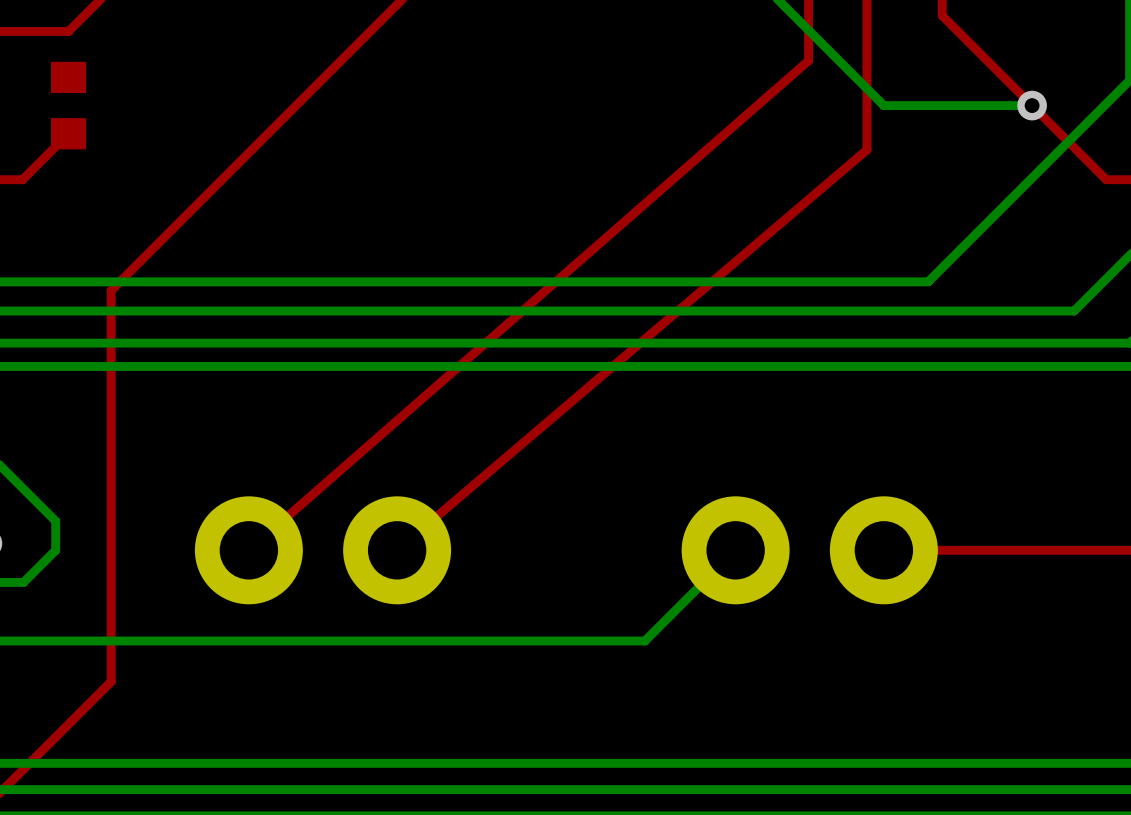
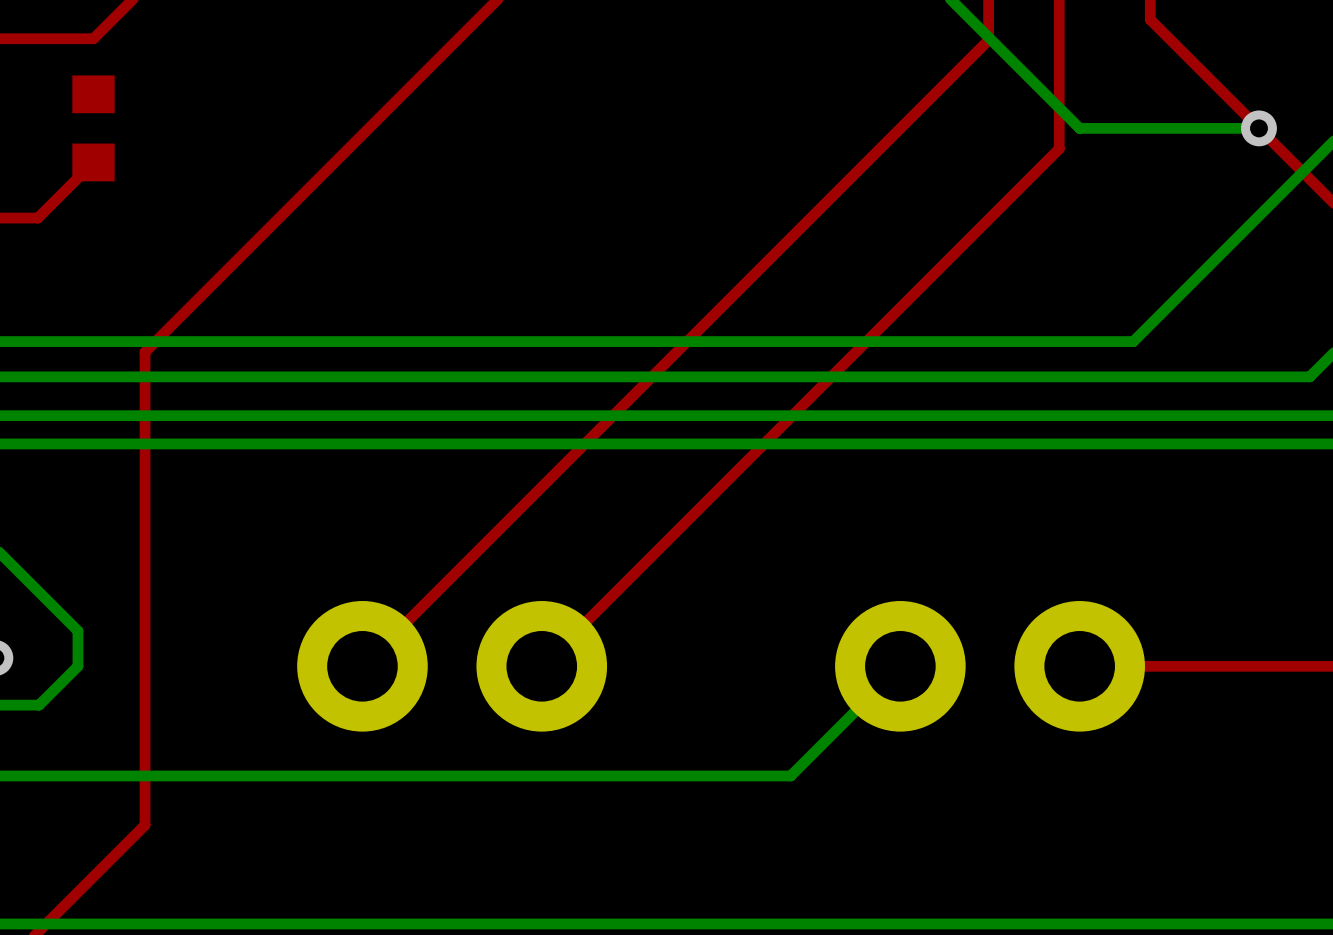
top track: (808, 32) (808, 60) (248, 550) -> (988, 40) (362, 666)
top track: (866, 122) (866, 149) (397, 550) -> (1059, 148) (541, 666)
part position: (322, 550) -> (452, 666)

